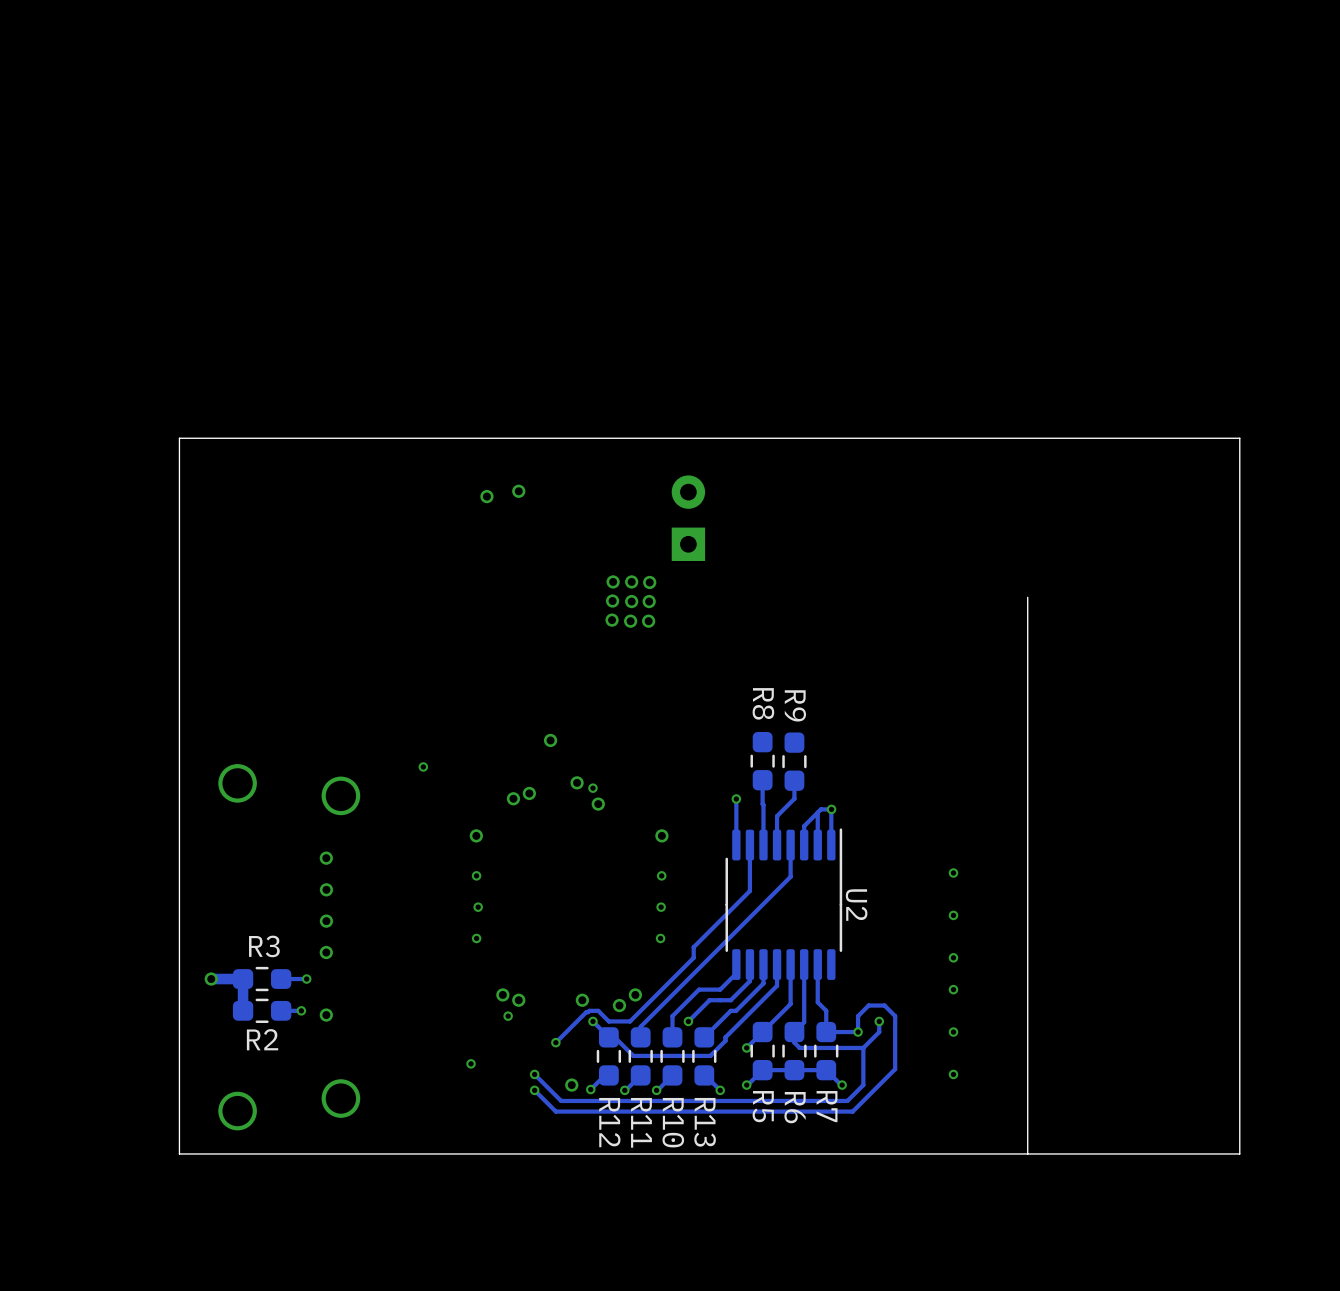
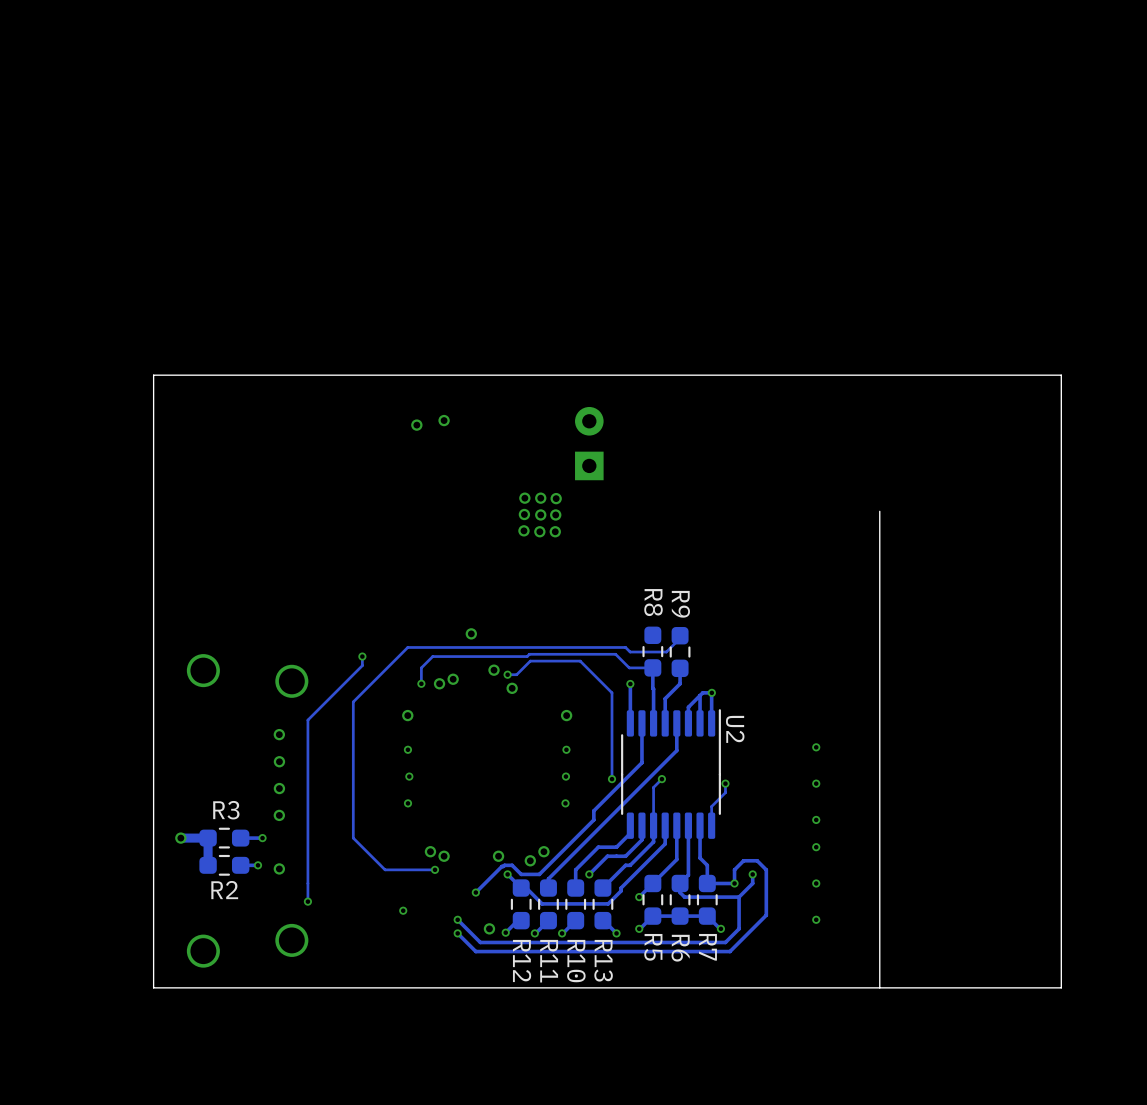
track: none -> (680, 635) (680, 638) (666, 652) (630, 652) (625, 647) (407, 647) (353, 701) (353, 838) (385, 869) (435, 869)
track: none -> (362, 656) (362, 665) (307, 720) (307, 901)
track: none -> (652, 667) (629, 667) (615, 654) (432, 656) (421, 667) (421, 683)
track: none -> (507, 674) (516, 674) (530, 661) (580, 661) (612, 692) (612, 779)
via: none -> (421, 683)
U2 name position: U2 (856, 905) -> U2 (735, 729)
via: none -> (612, 779)
track: none -> (661, 779) (653, 787) (653, 825)
via: none -> (661, 779)
track: none -> (725, 783) (725, 792) (711, 806) (711, 825)
via: none -> (725, 783)
via: none -> (307, 901)

